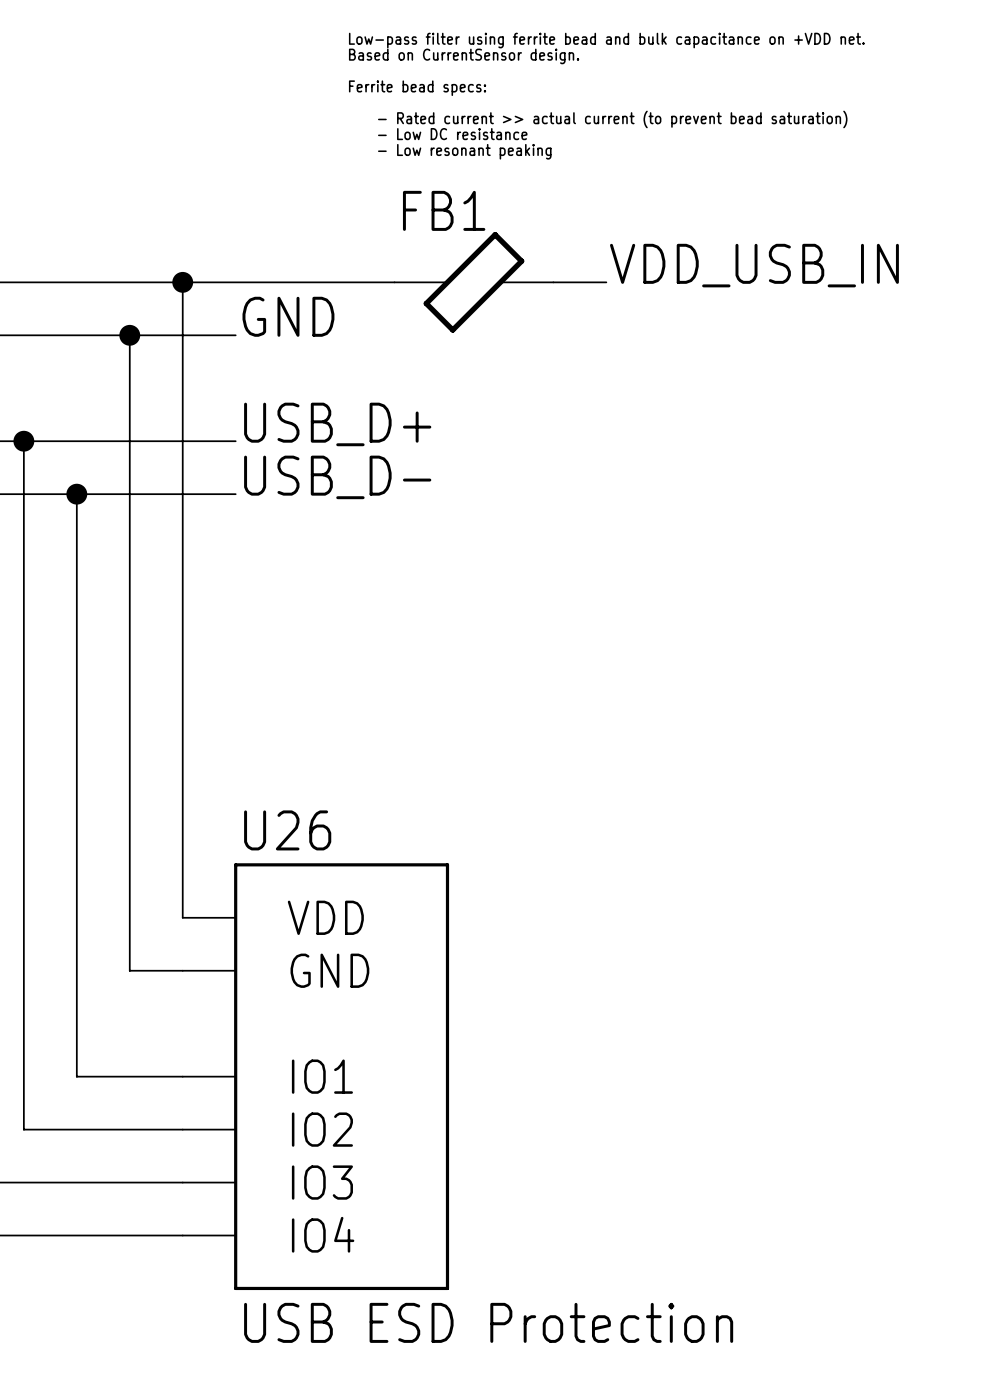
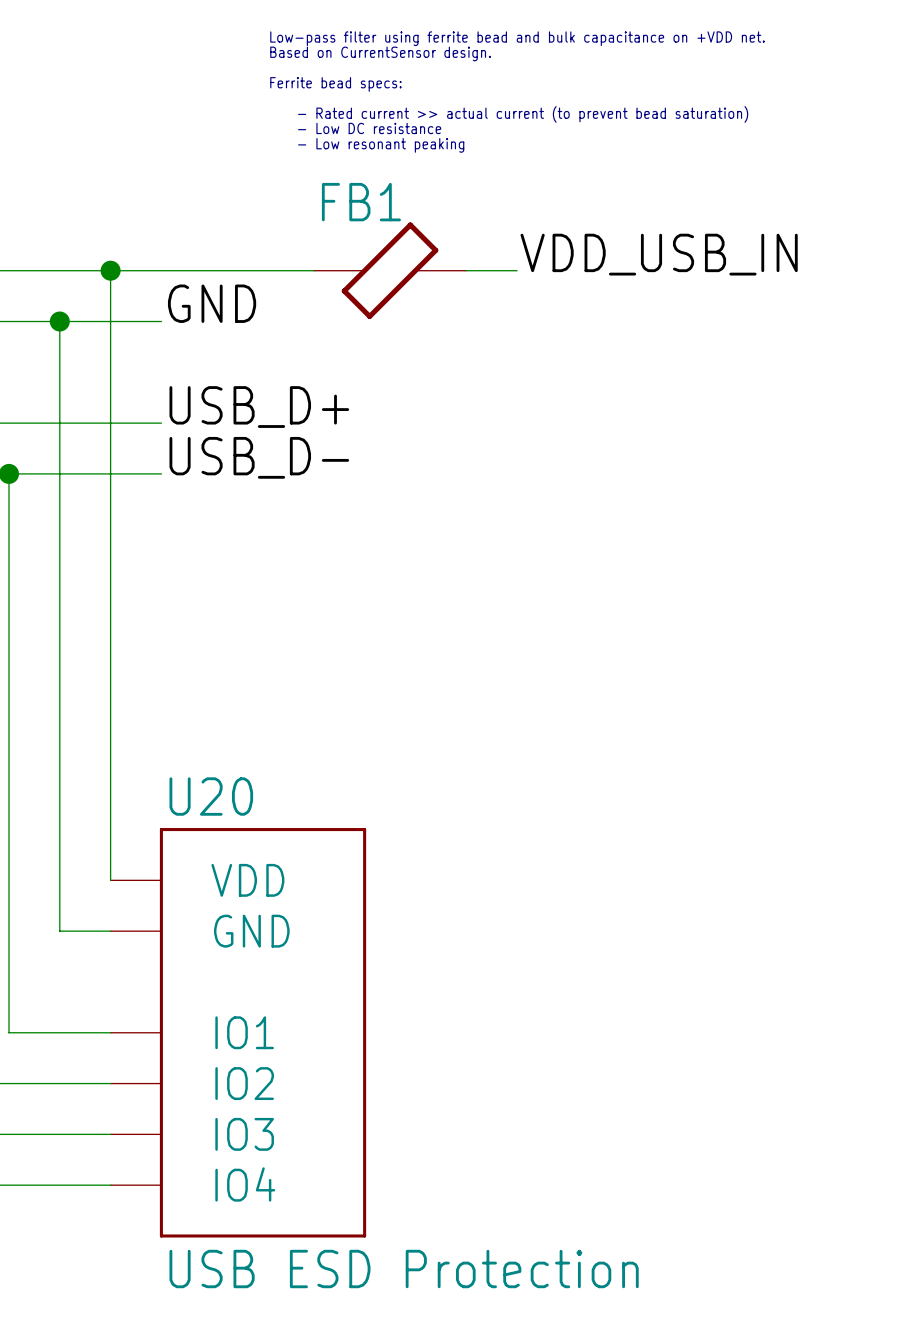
U26 name: U26 (287, 830) -> U20 (211, 796)

